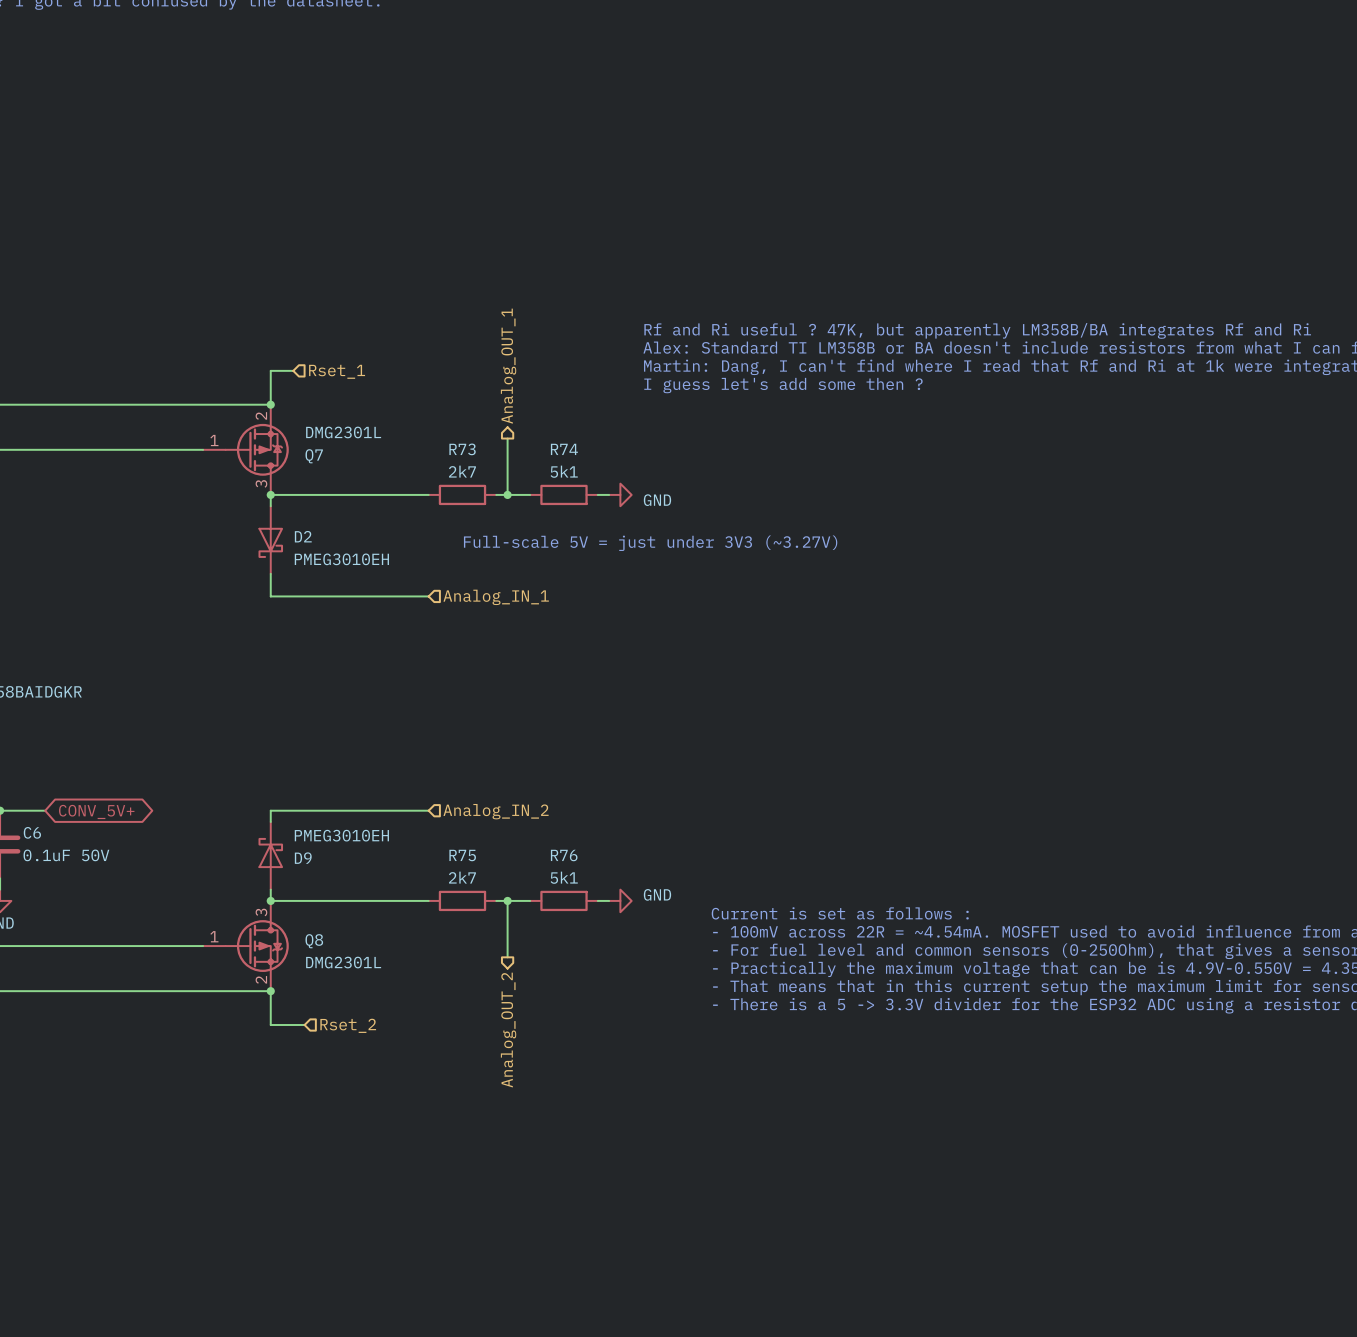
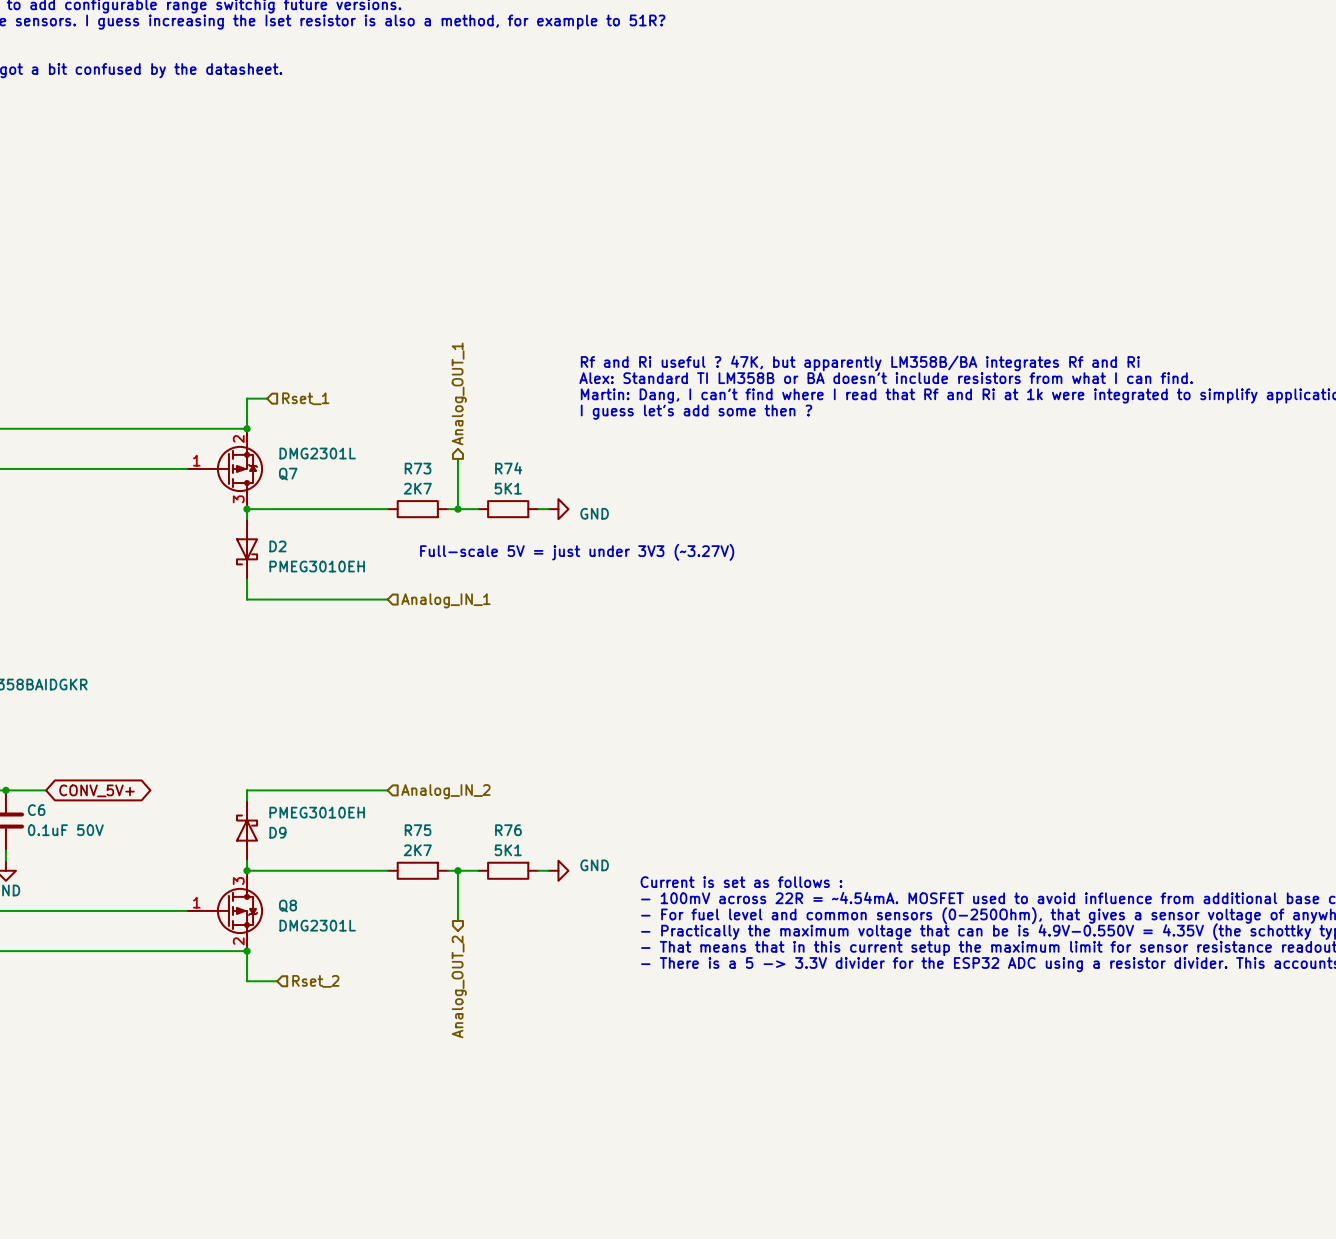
R73 value: 2k7 (462, 471) -> 2K7 (417, 488)
R74 value: 5k1 (564, 471) -> 5K1 (508, 488)
R75 value: 2k7 (462, 877) -> 2K7 (417, 850)
R76 value: 5k1 (564, 877) -> 5K1 (508, 850)

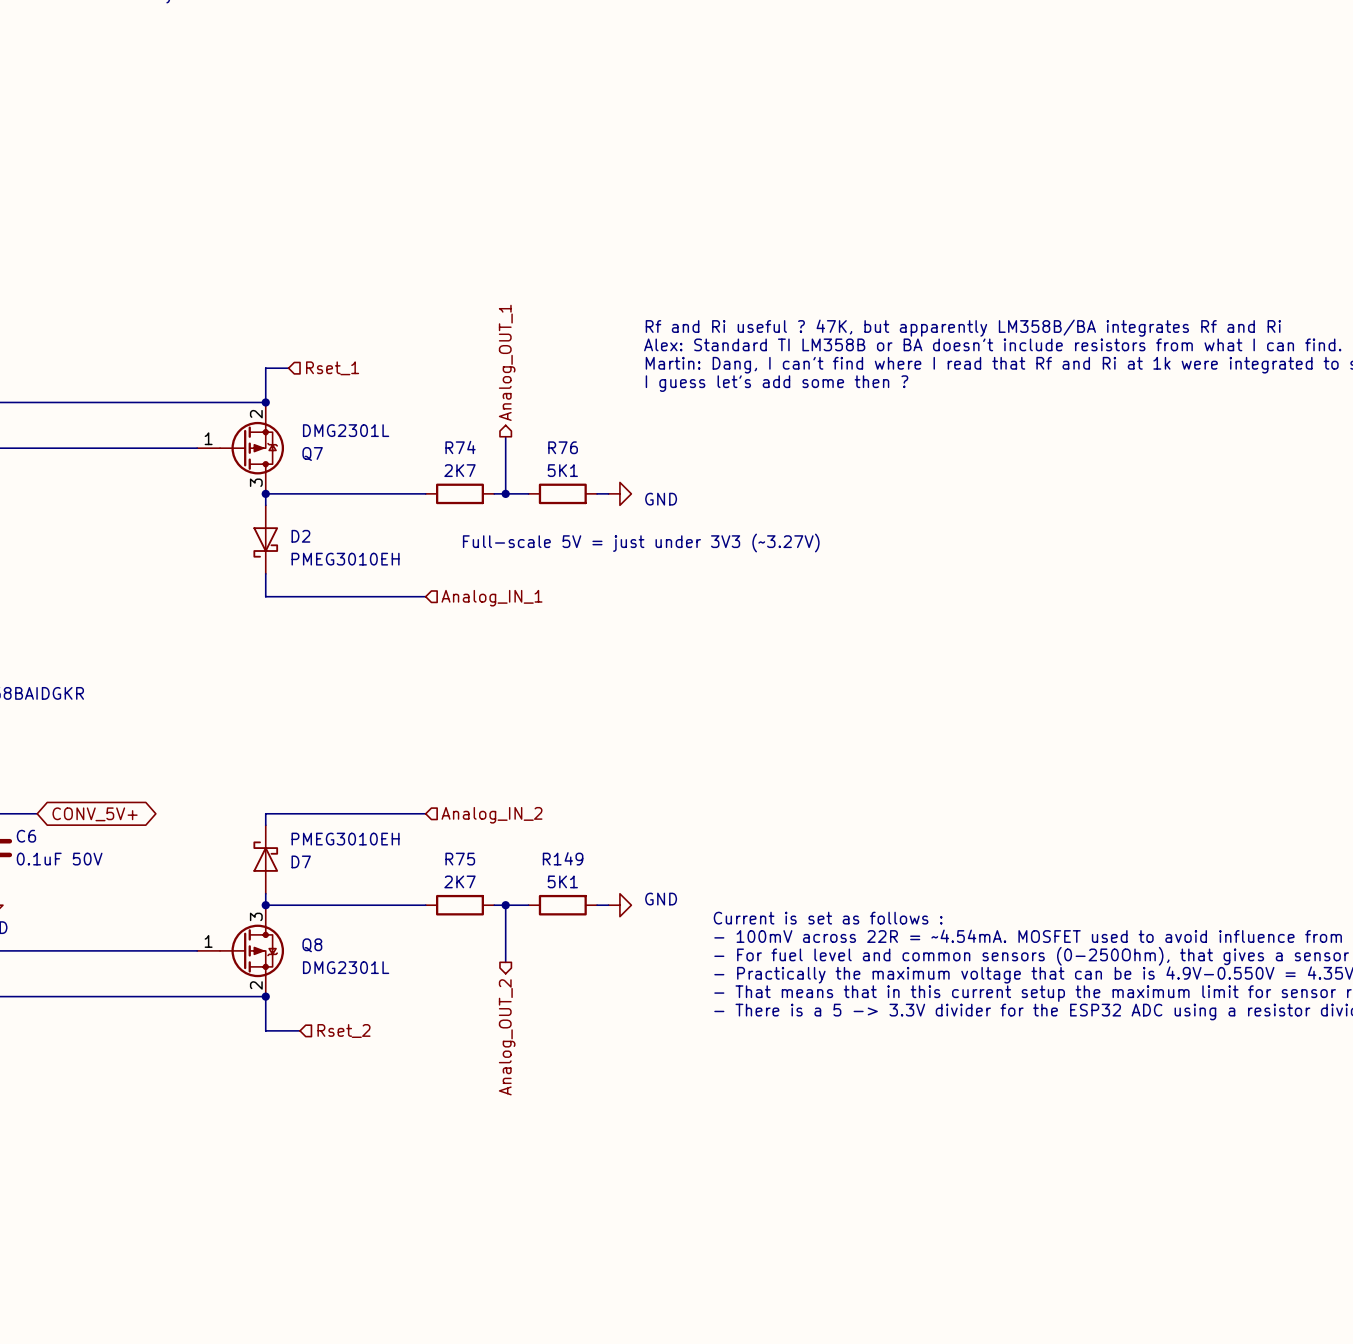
R73 name: R73 (418, 468) -> R74 (460, 447)
R74 name: R74 (508, 468) -> R76 (563, 447)
R76 name: R76 (508, 830) -> R149 (563, 858)
D9 name: D9 (277, 832) -> D7 (301, 861)

